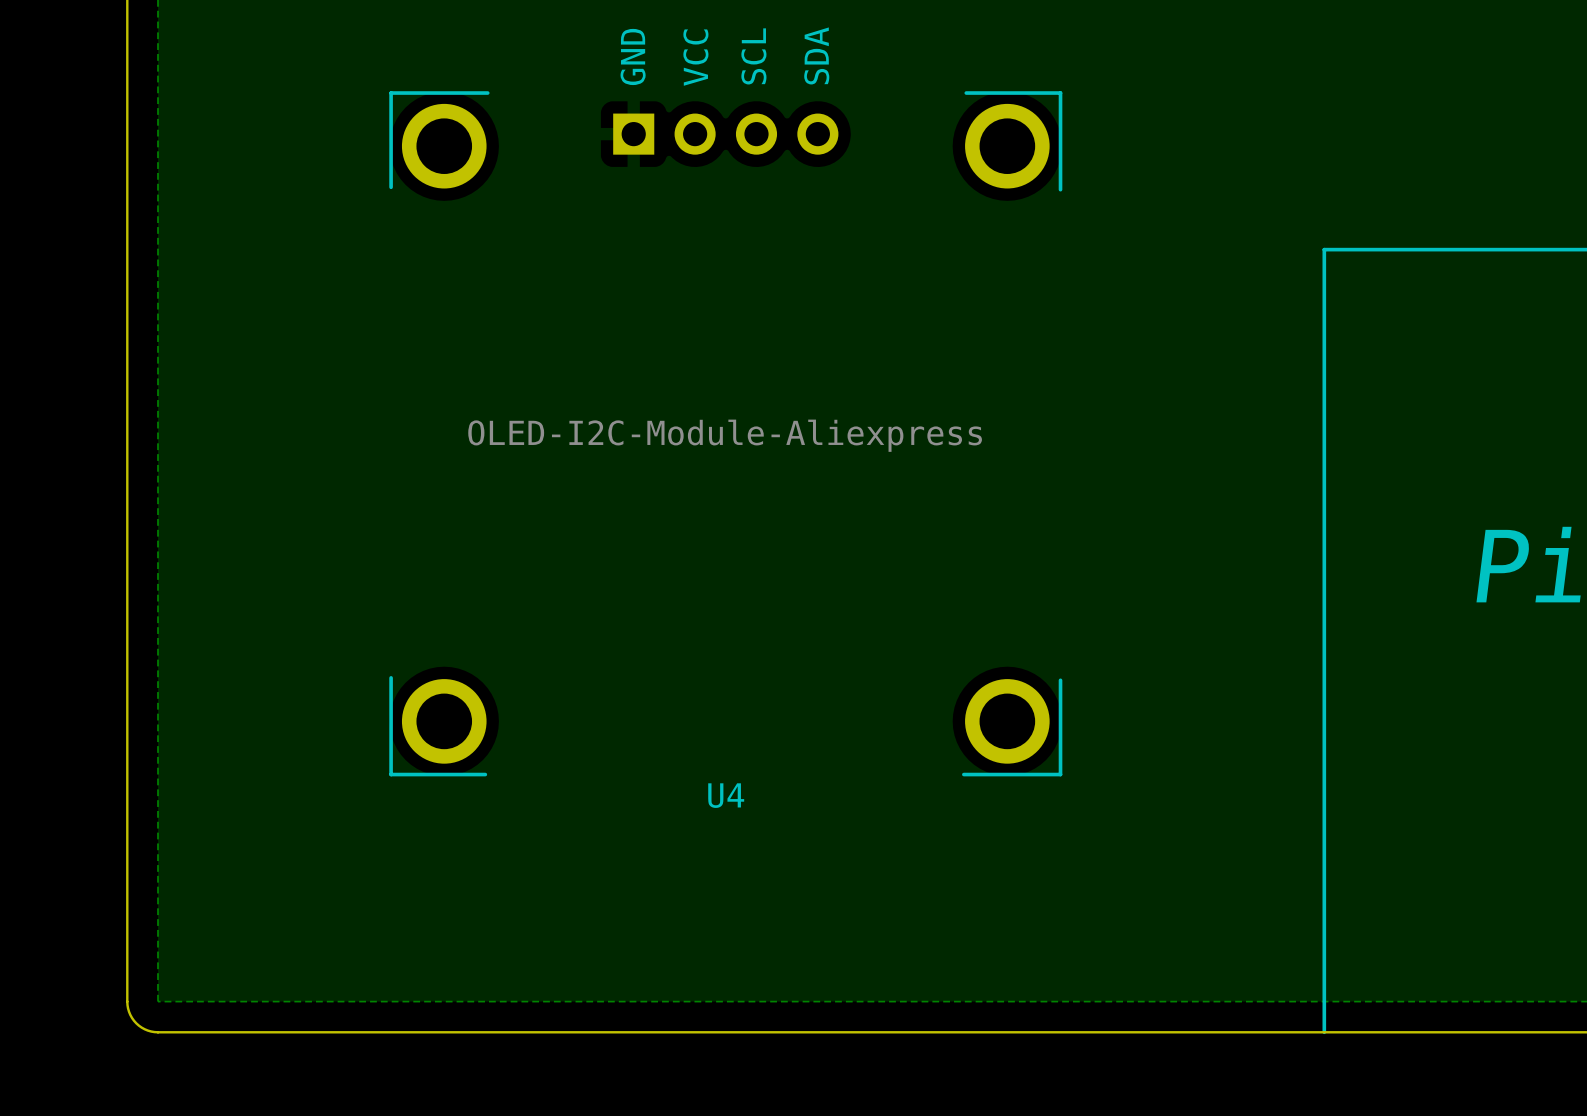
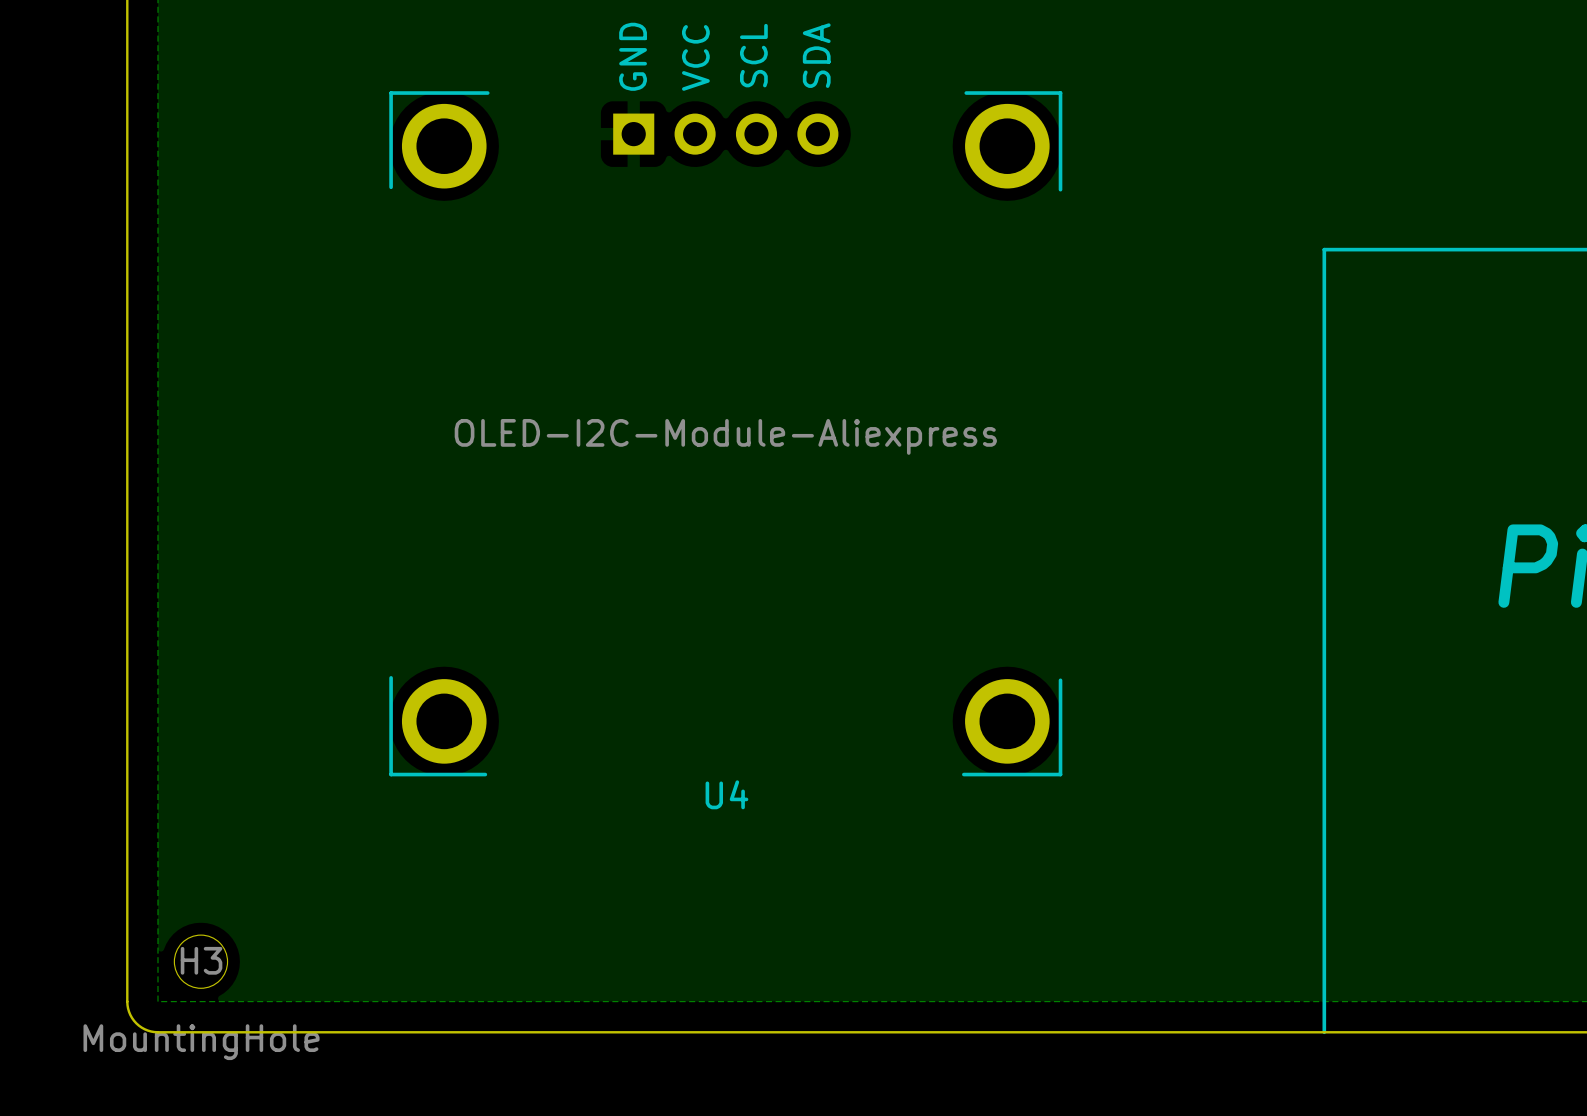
H3: none -> MountingHole (200, 961)

